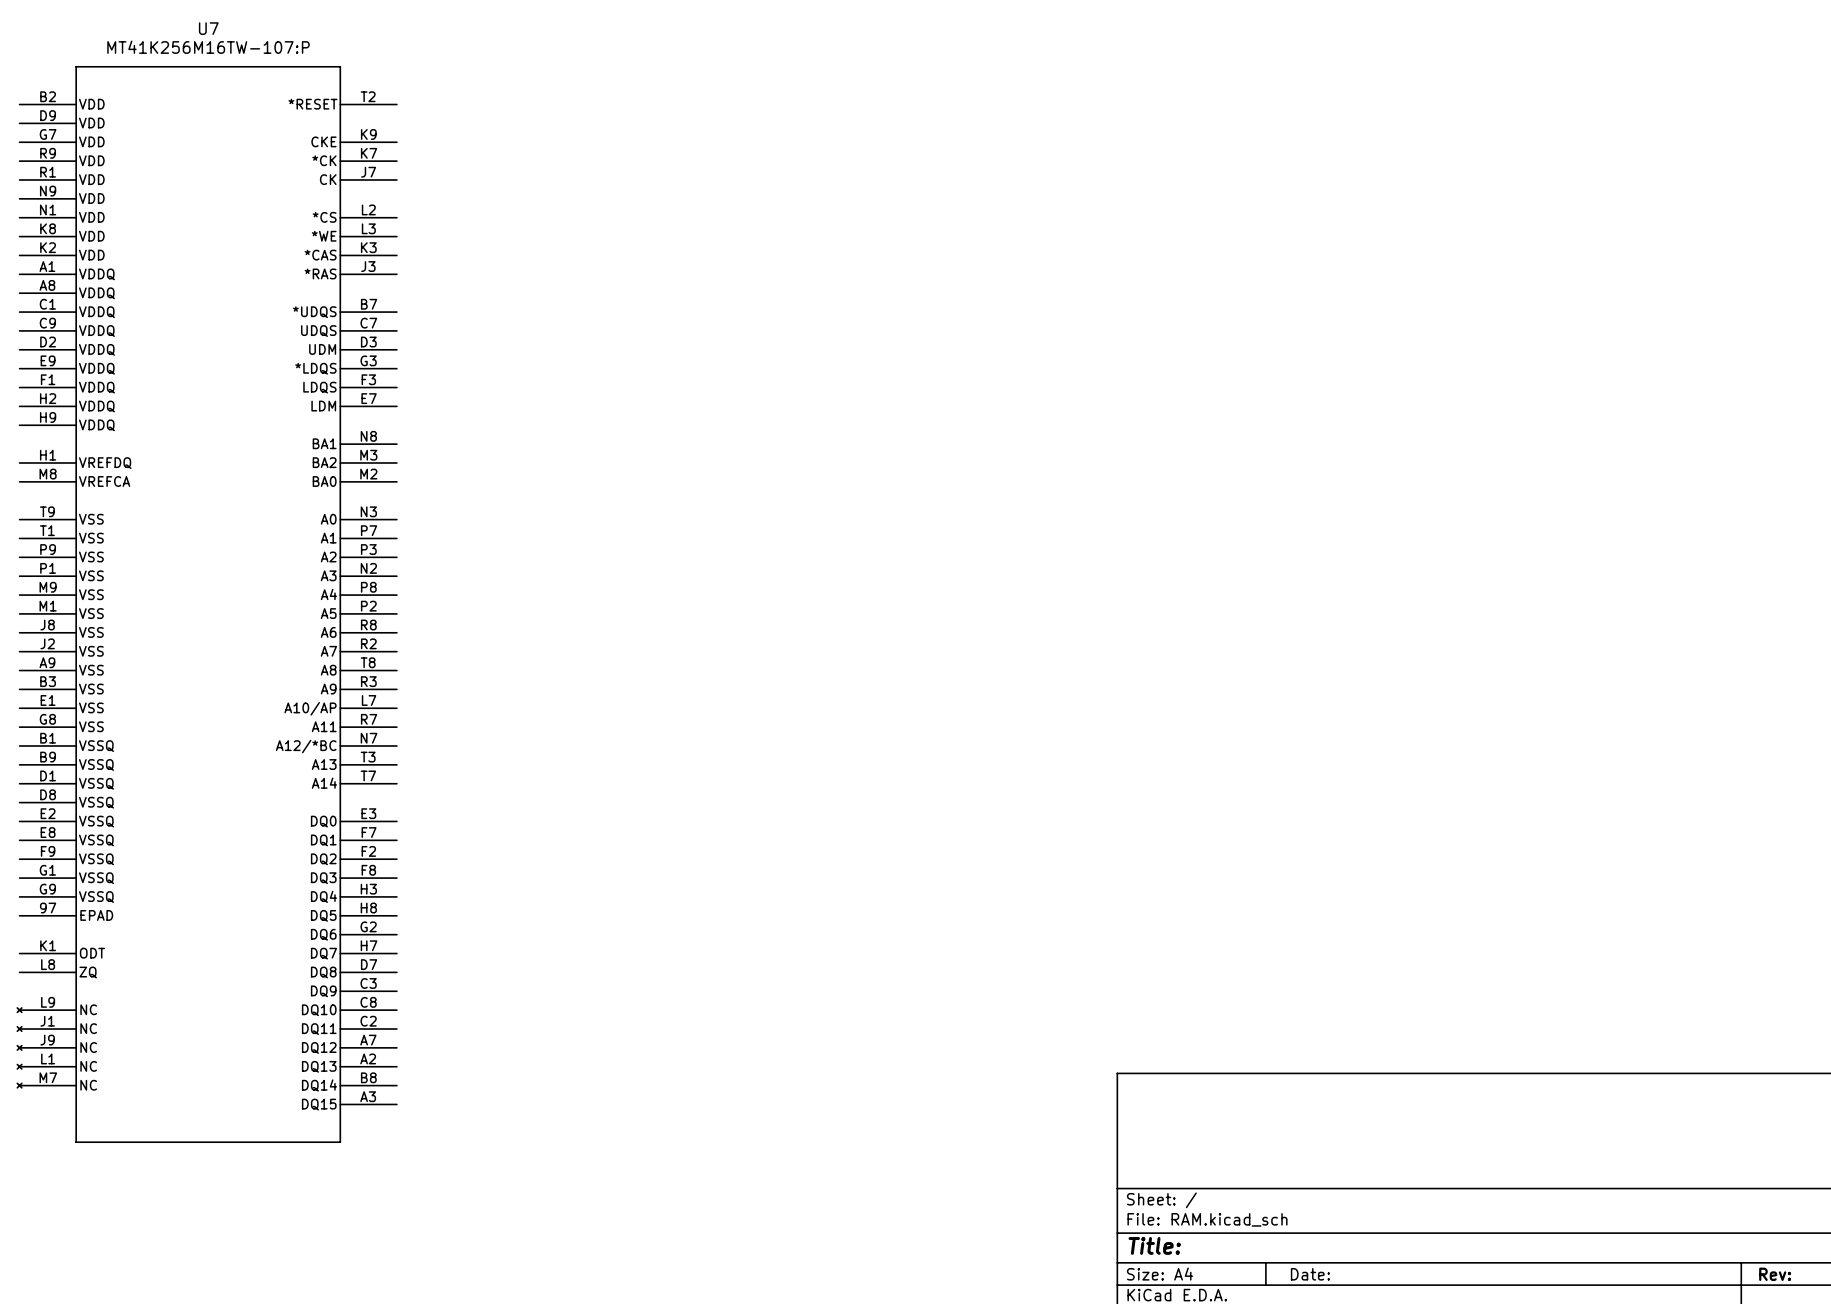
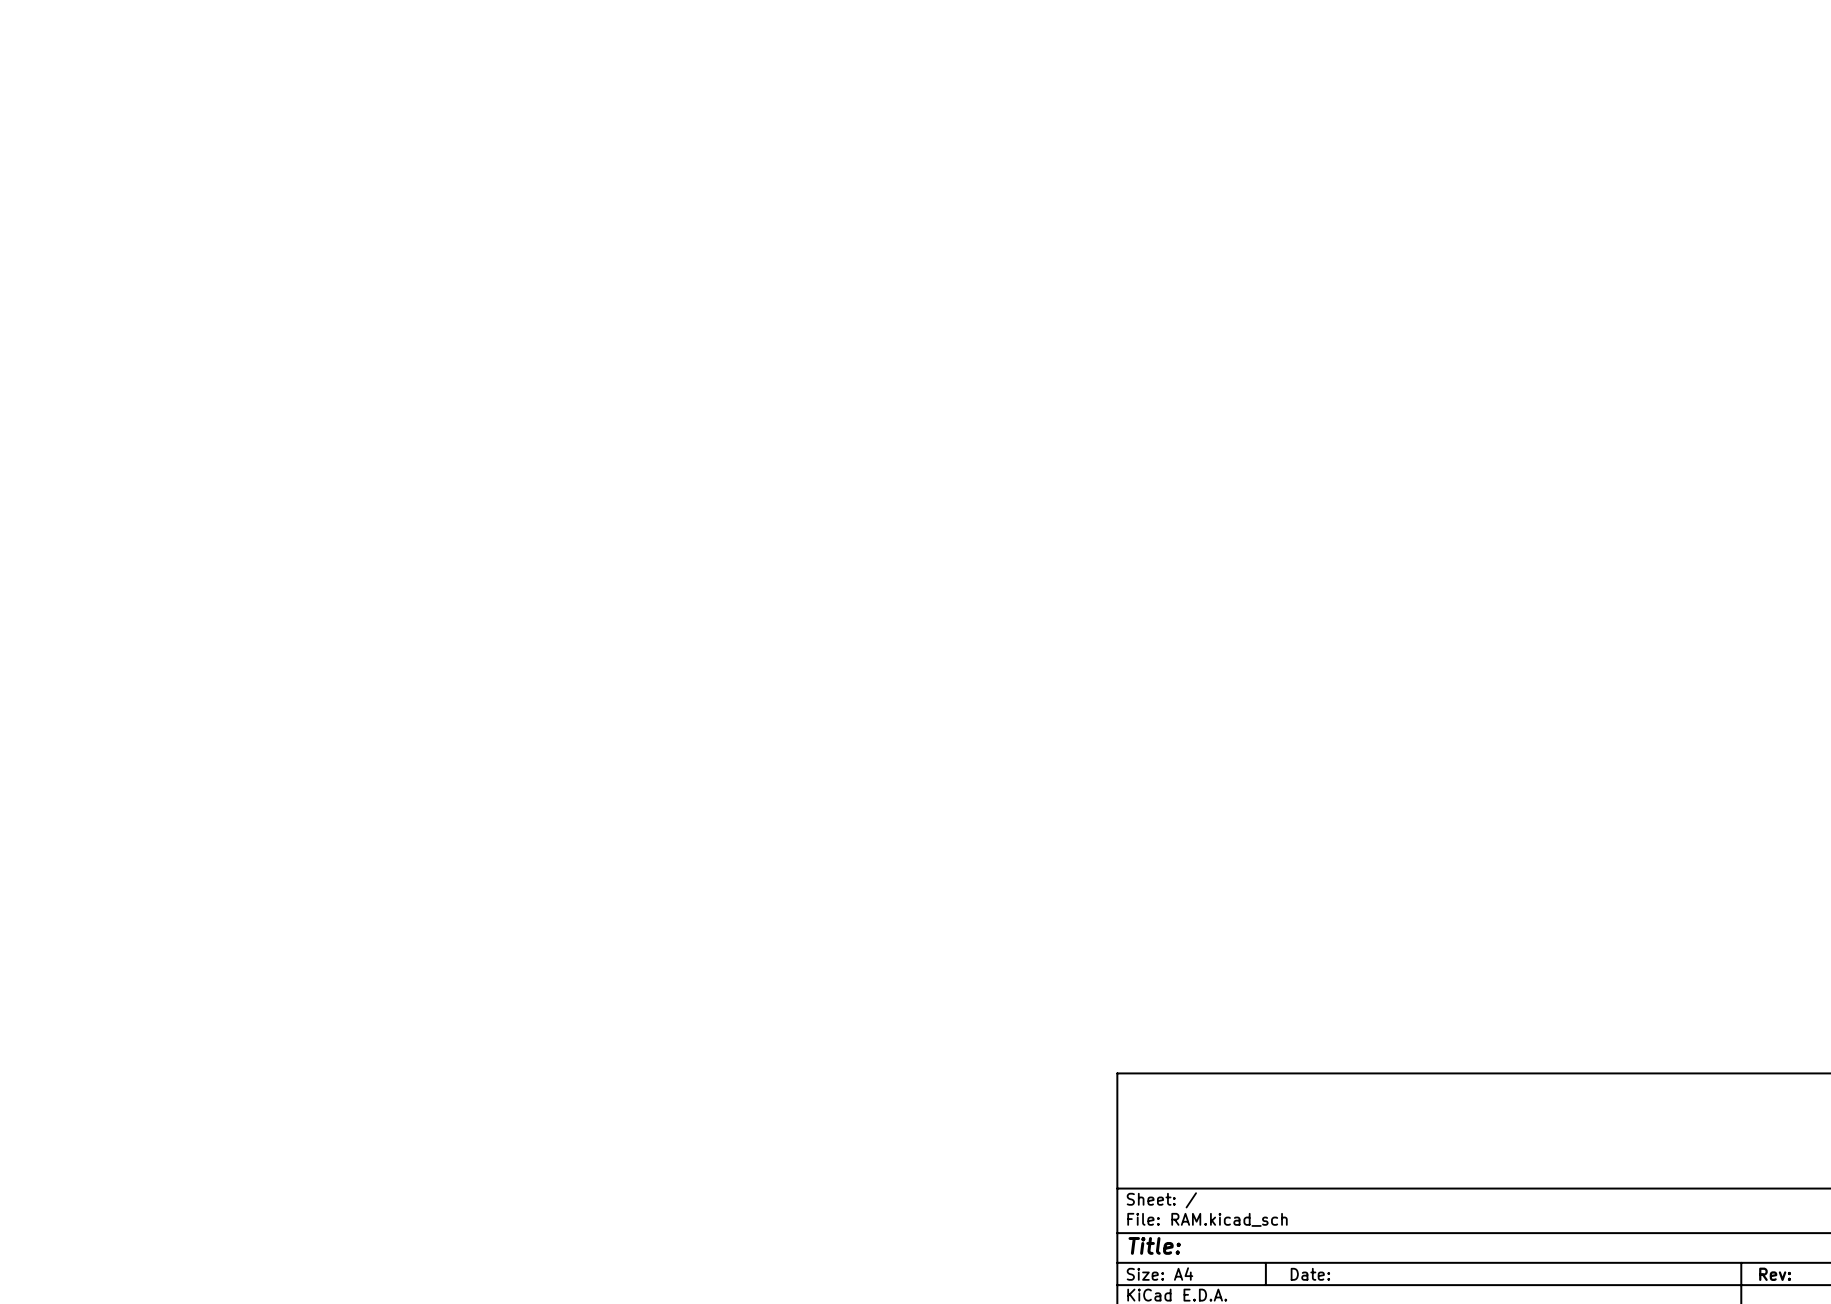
U7: MT41K256M16TW-107:P (207, 604) -> none

